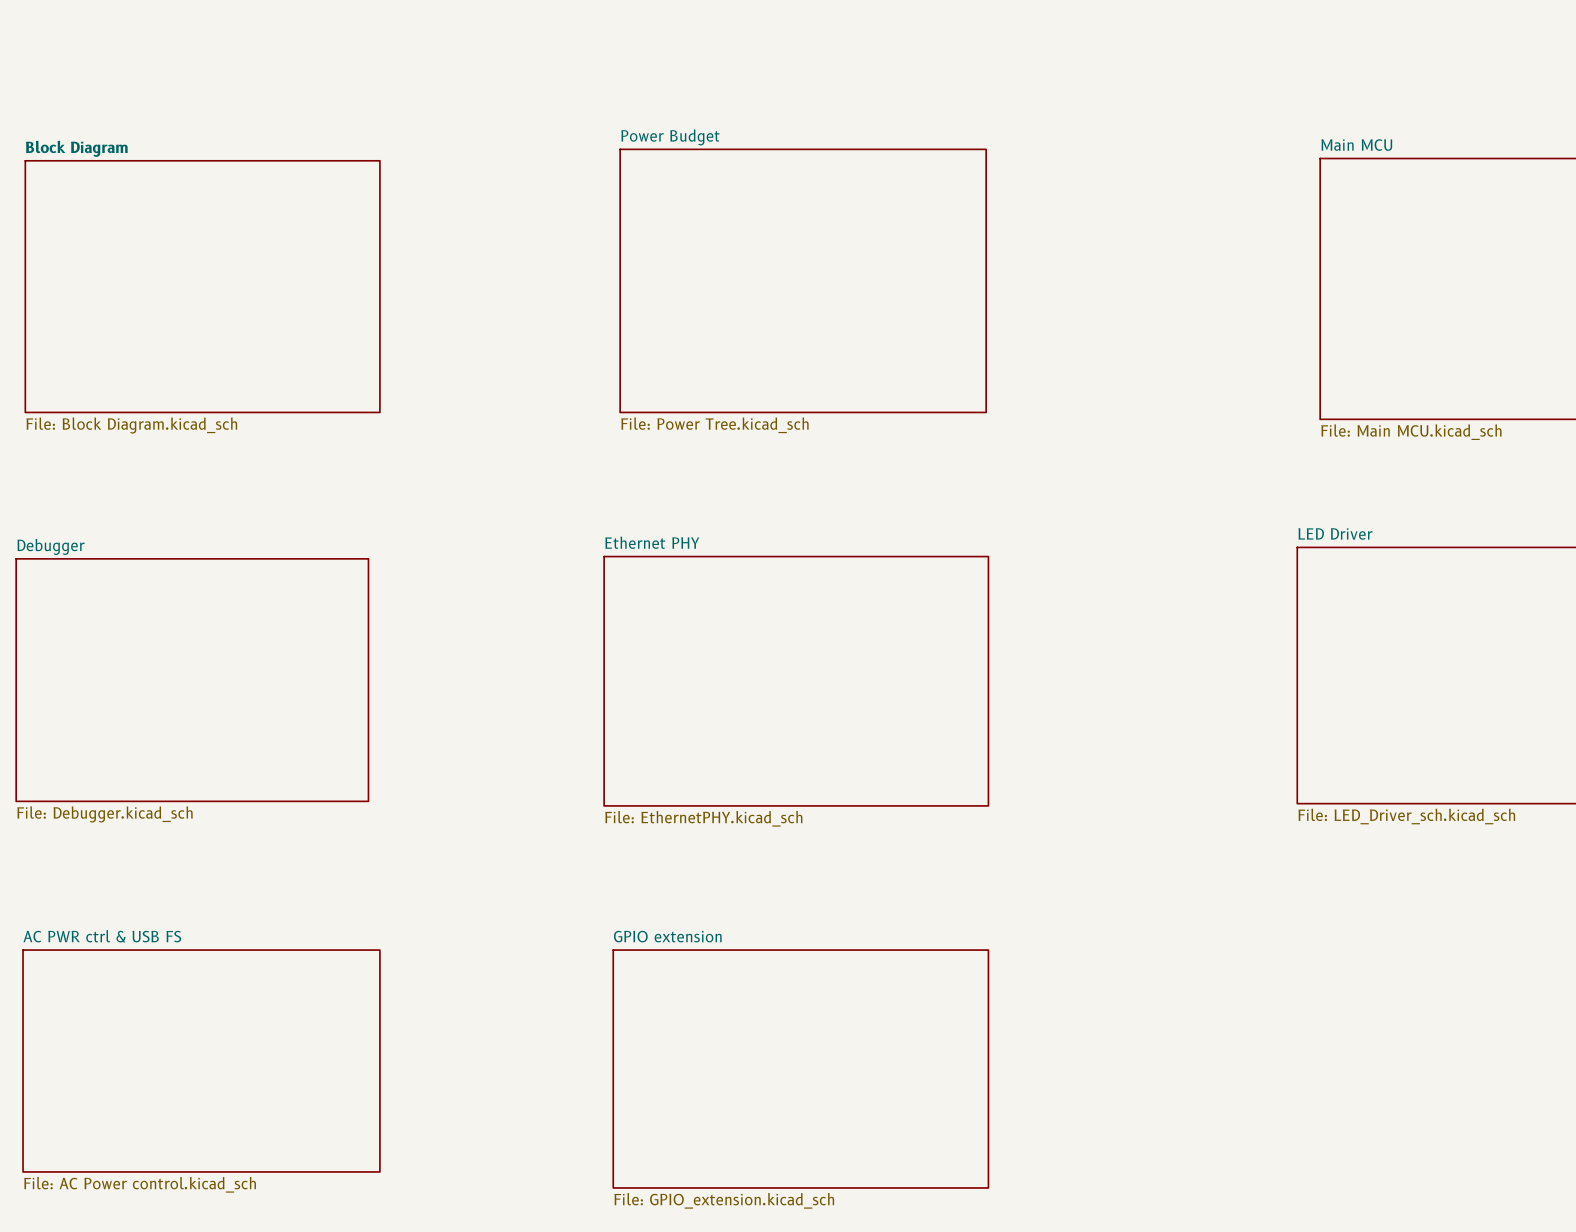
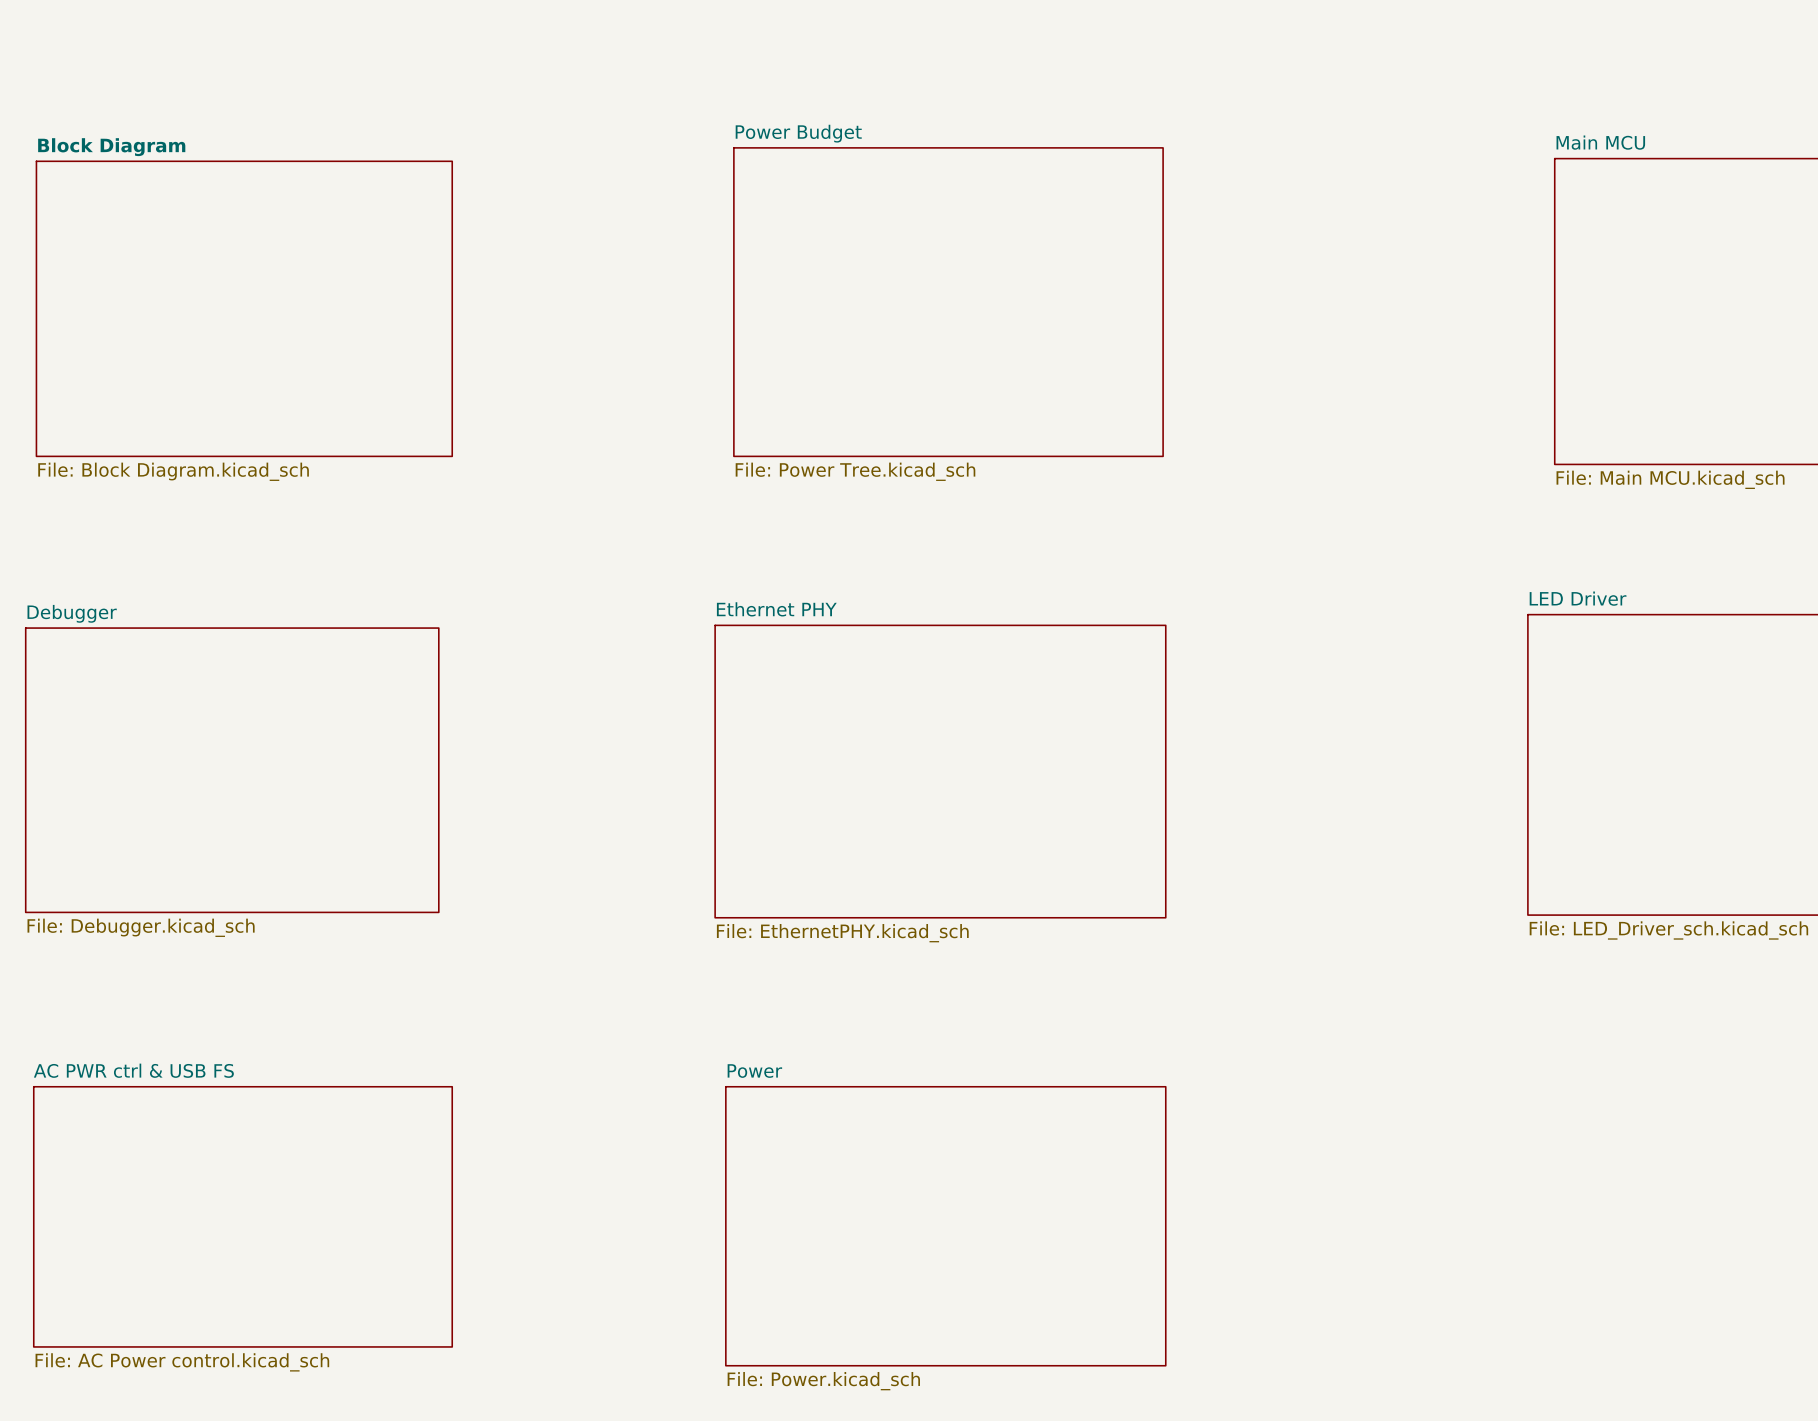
sheet GPIO extension name: GPIO extension (667, 936) -> Power (754, 1071)
sheet GPIO extension value: File: GPIO_extension.kicad_sch (724, 1200) -> File: Power.kicad_sch (823, 1381)

